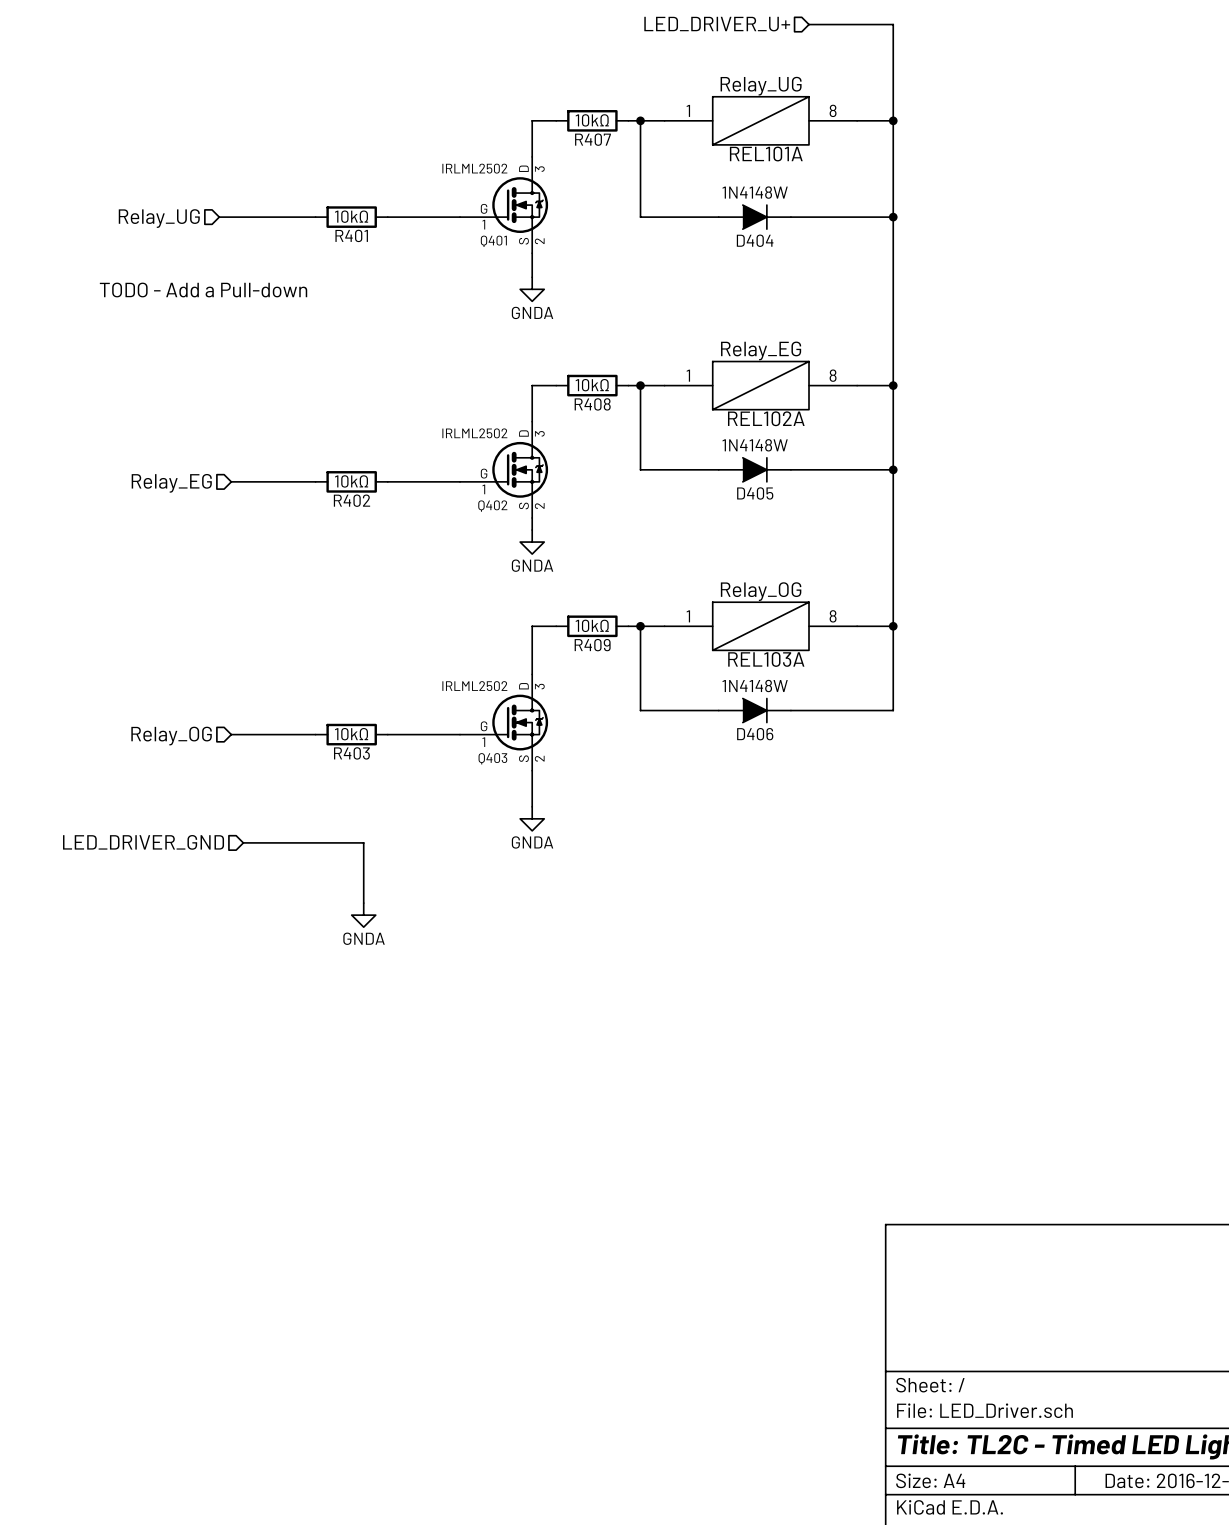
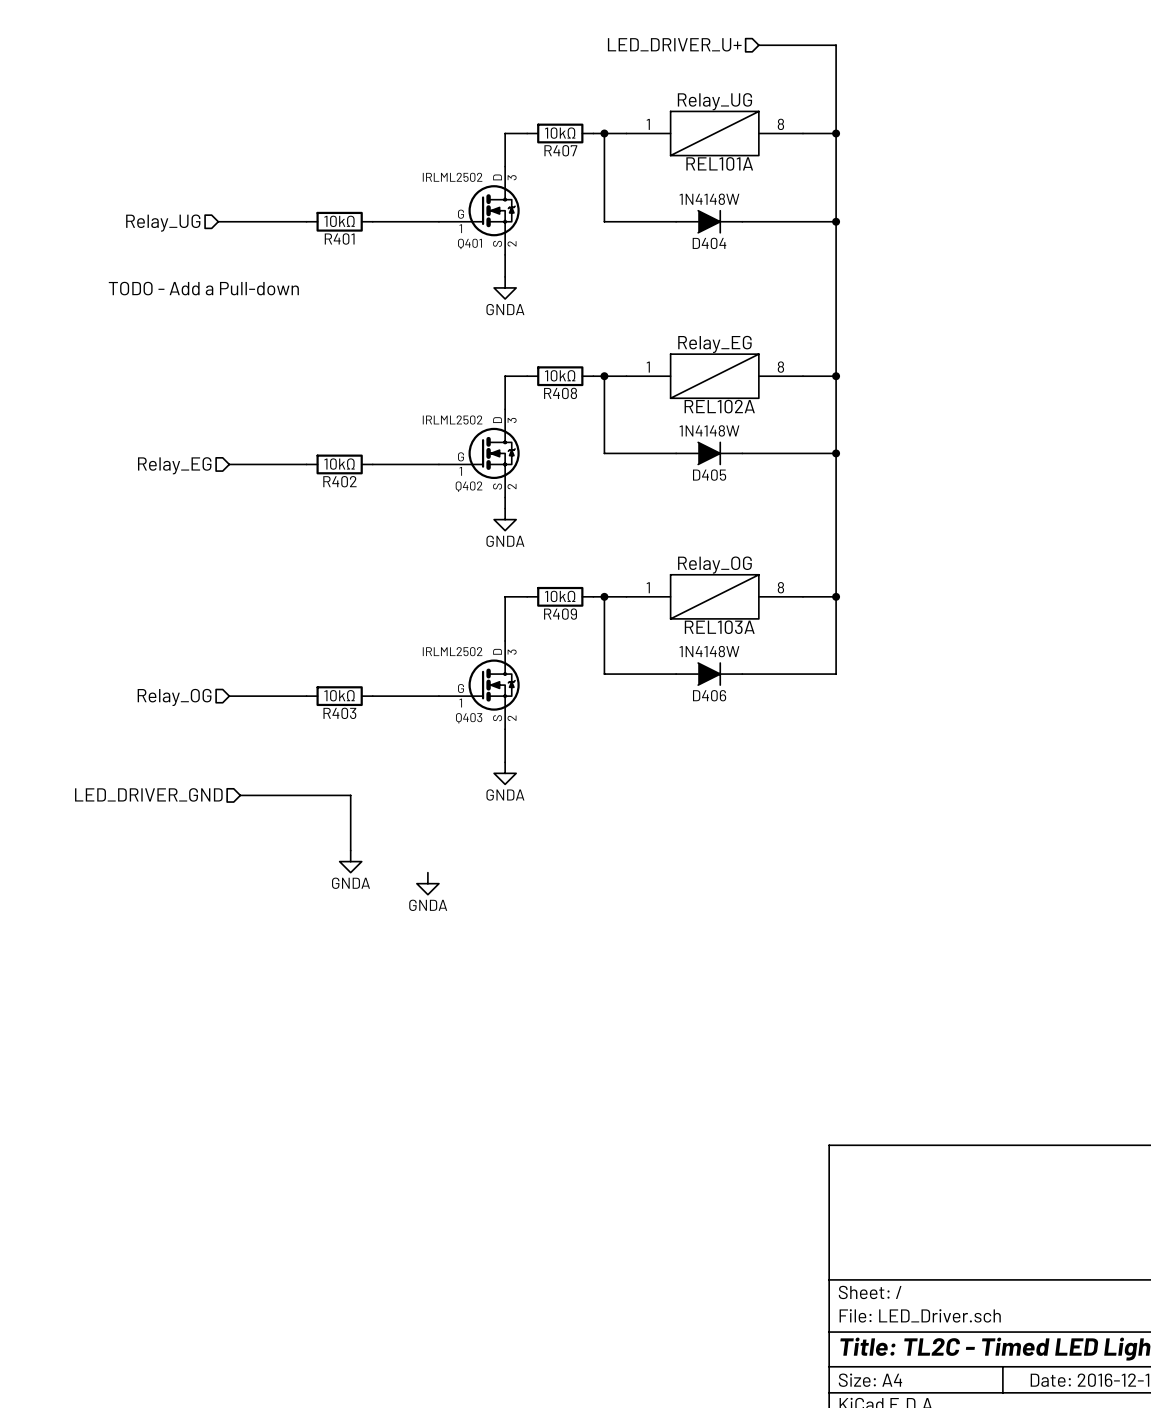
power symbol: none -> GNDA (427, 883)

